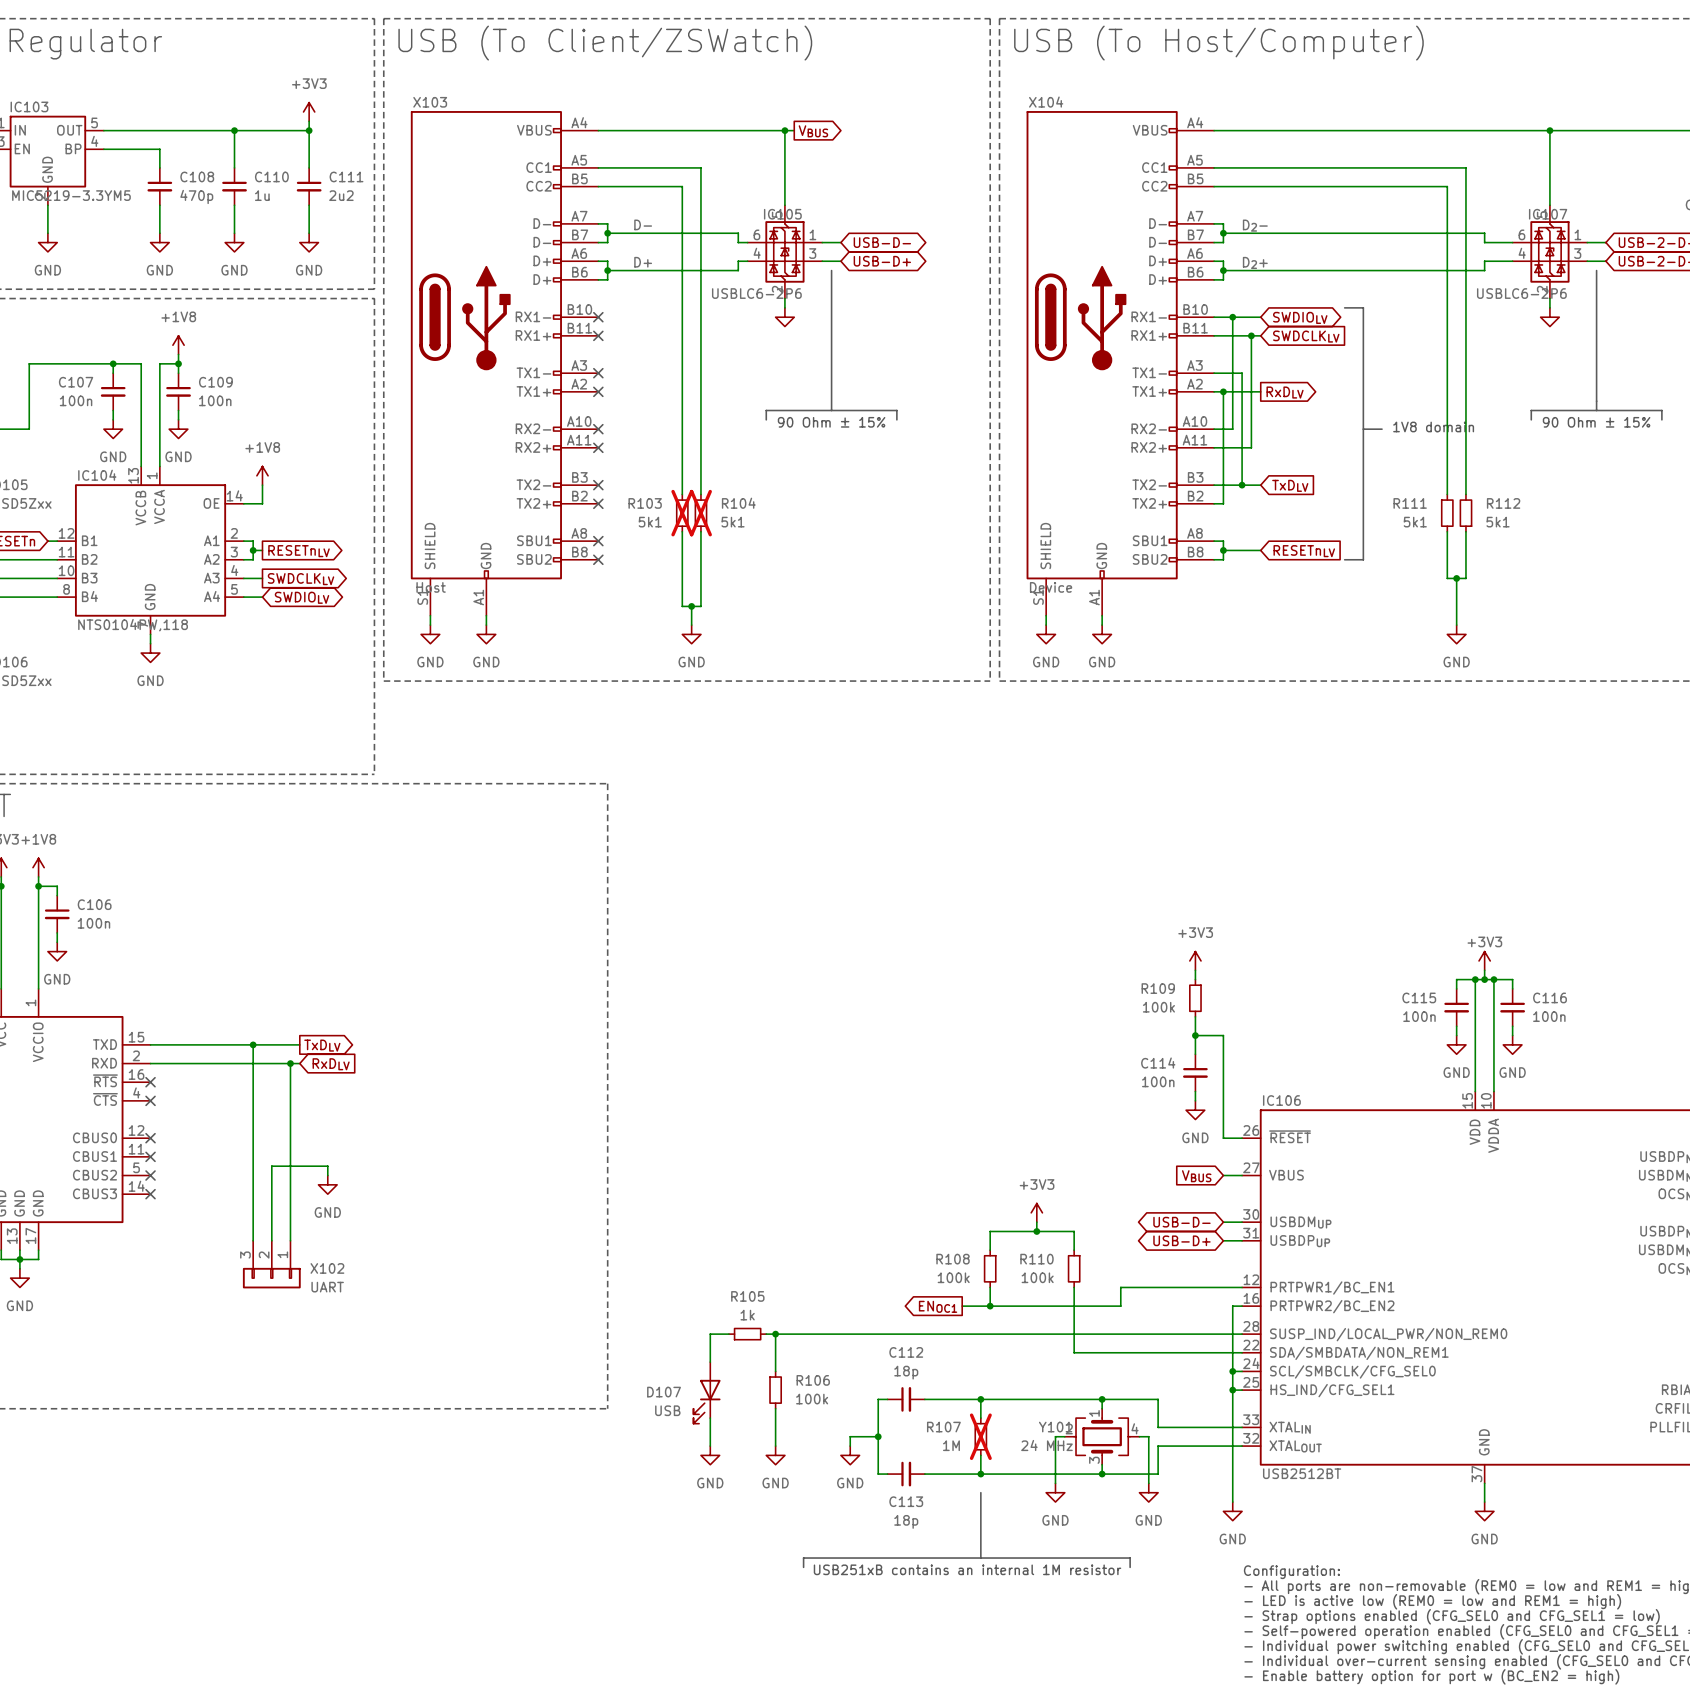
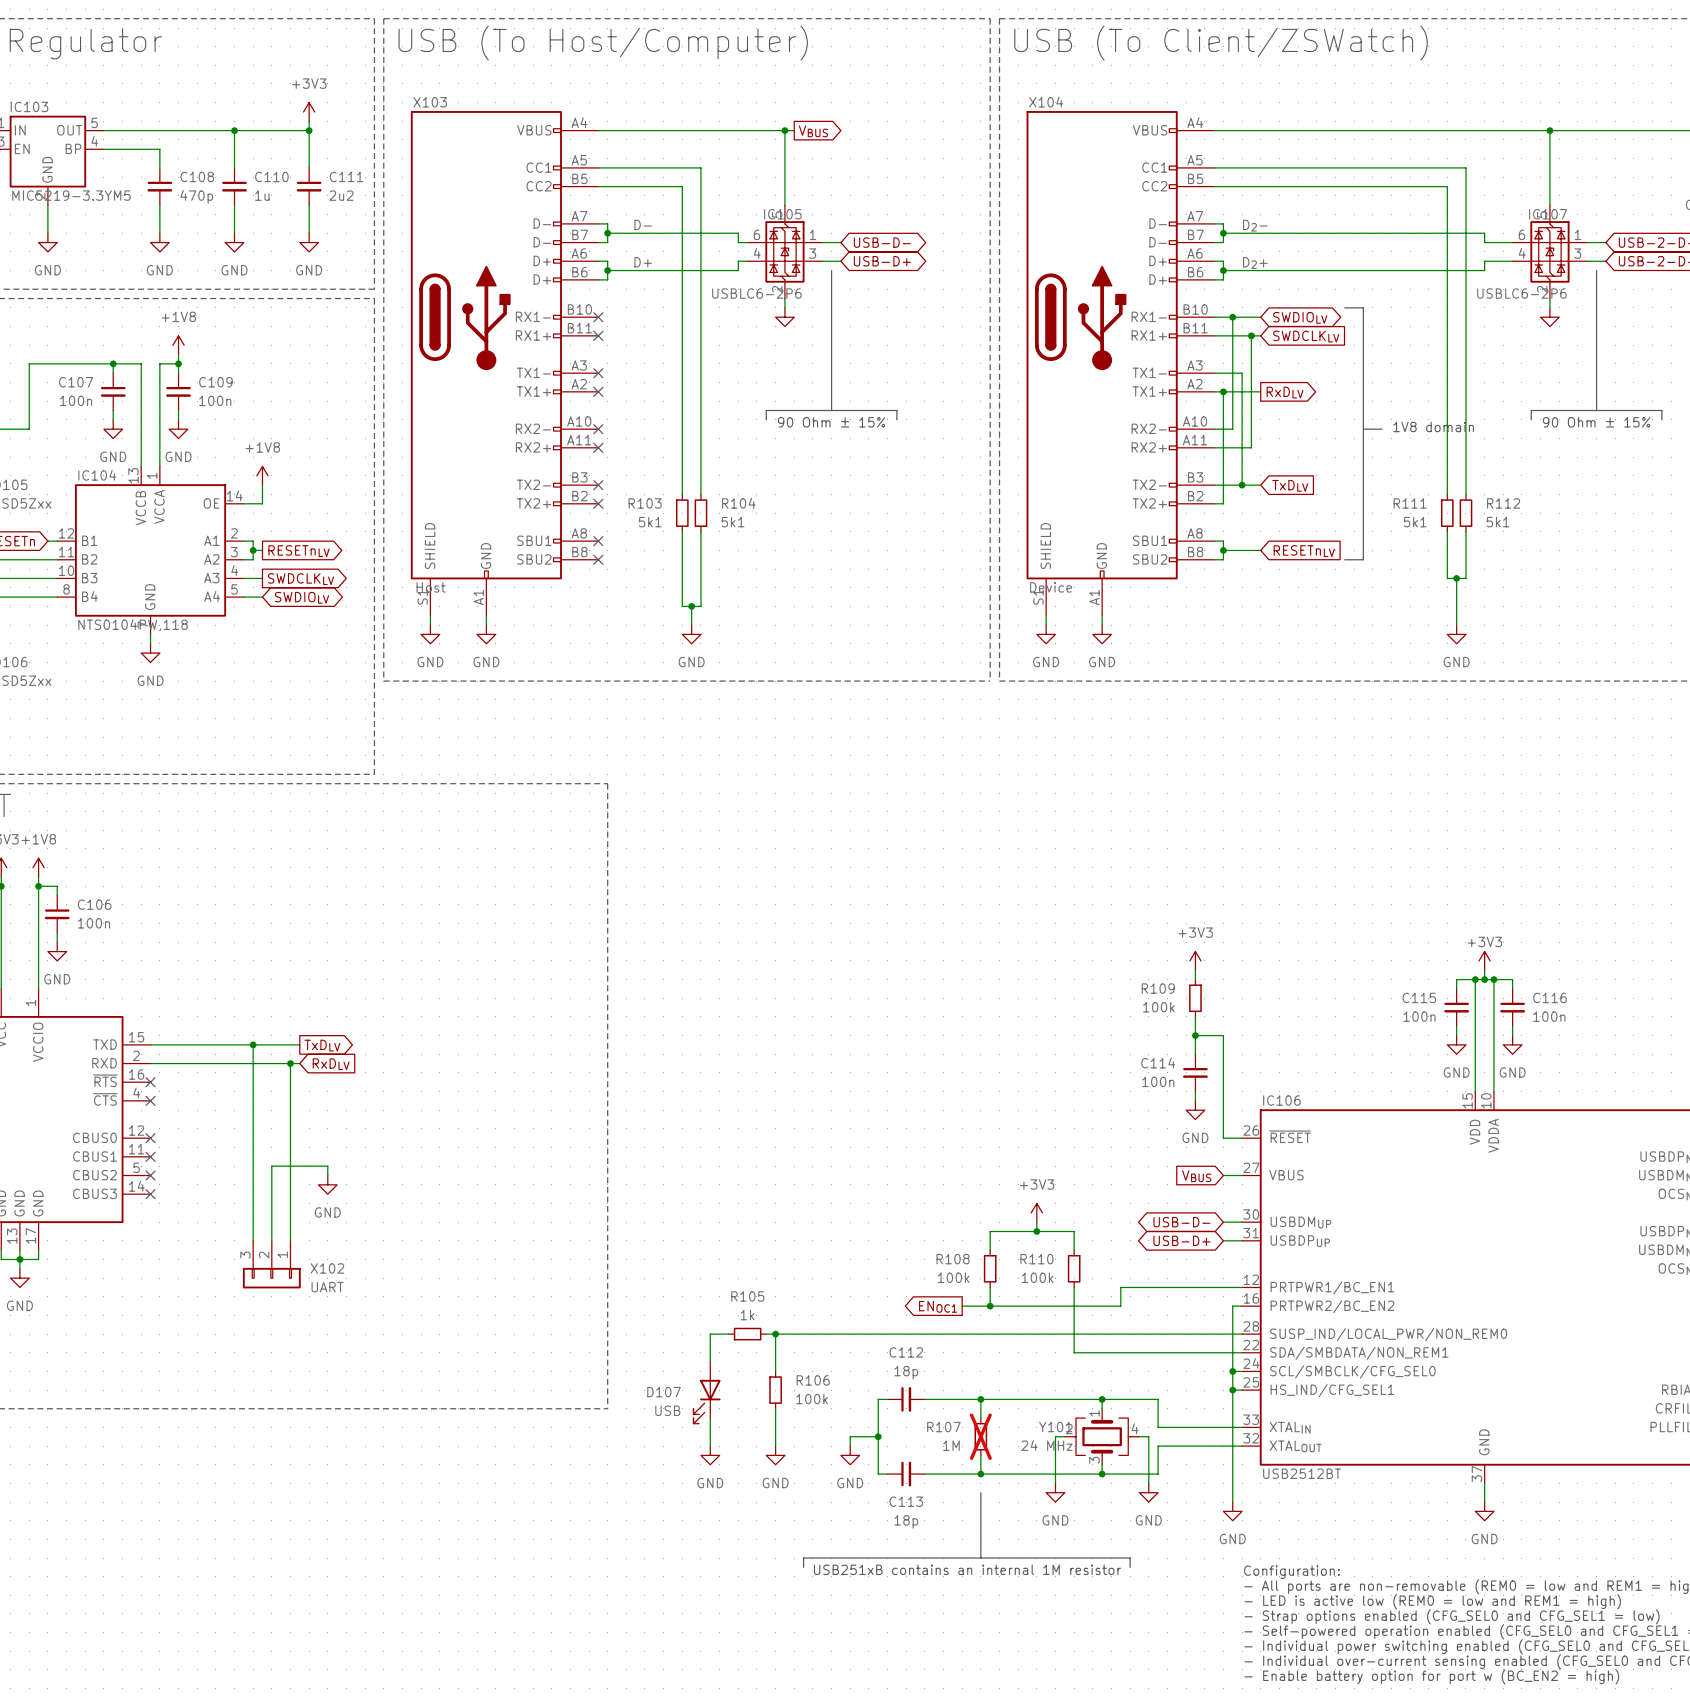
text: USB (To Client/ZSWatch) (605, 43) -> USB (To Host/Computer) (603, 43)
text: USB (To Host/Computer) (1218, 43) -> USB (To Client/ZSWatch) (1221, 43)
R103 do-not-place cross: (682, 513) -> none
R104 do-not-place cross: (700, 513) -> none

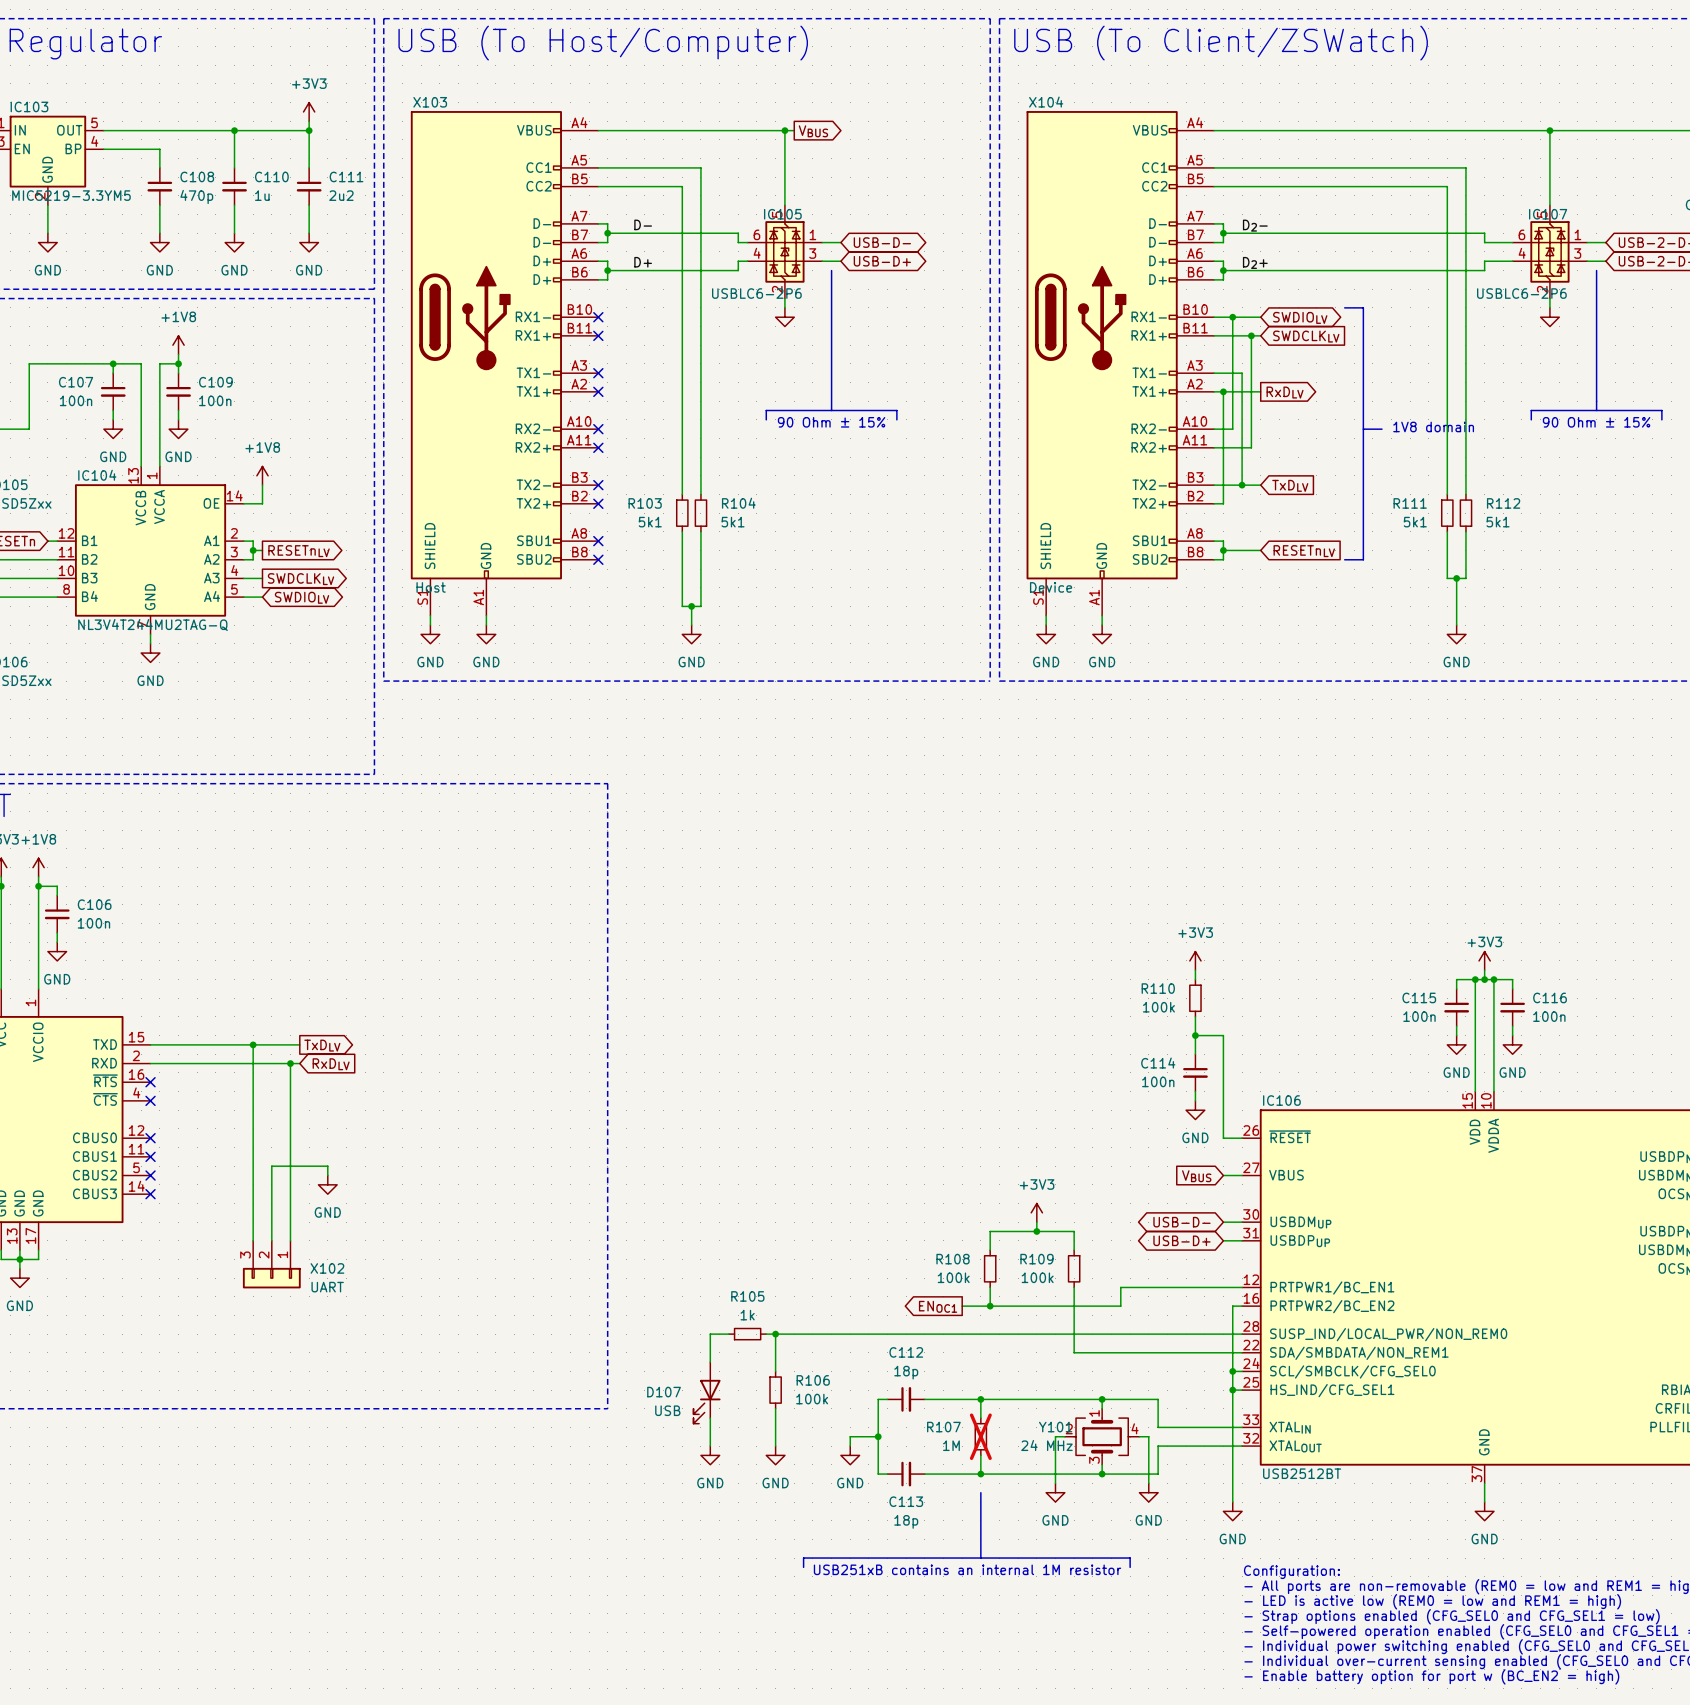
IC104 value: NTS0104PW,118 (133, 625) -> NL3V4T244MU2TAG-Q (153, 624)
R109 name: R109 (1158, 988) -> R110 (1158, 988)
R110 name: R110 (1036, 1259) -> R109 (1036, 1259)

